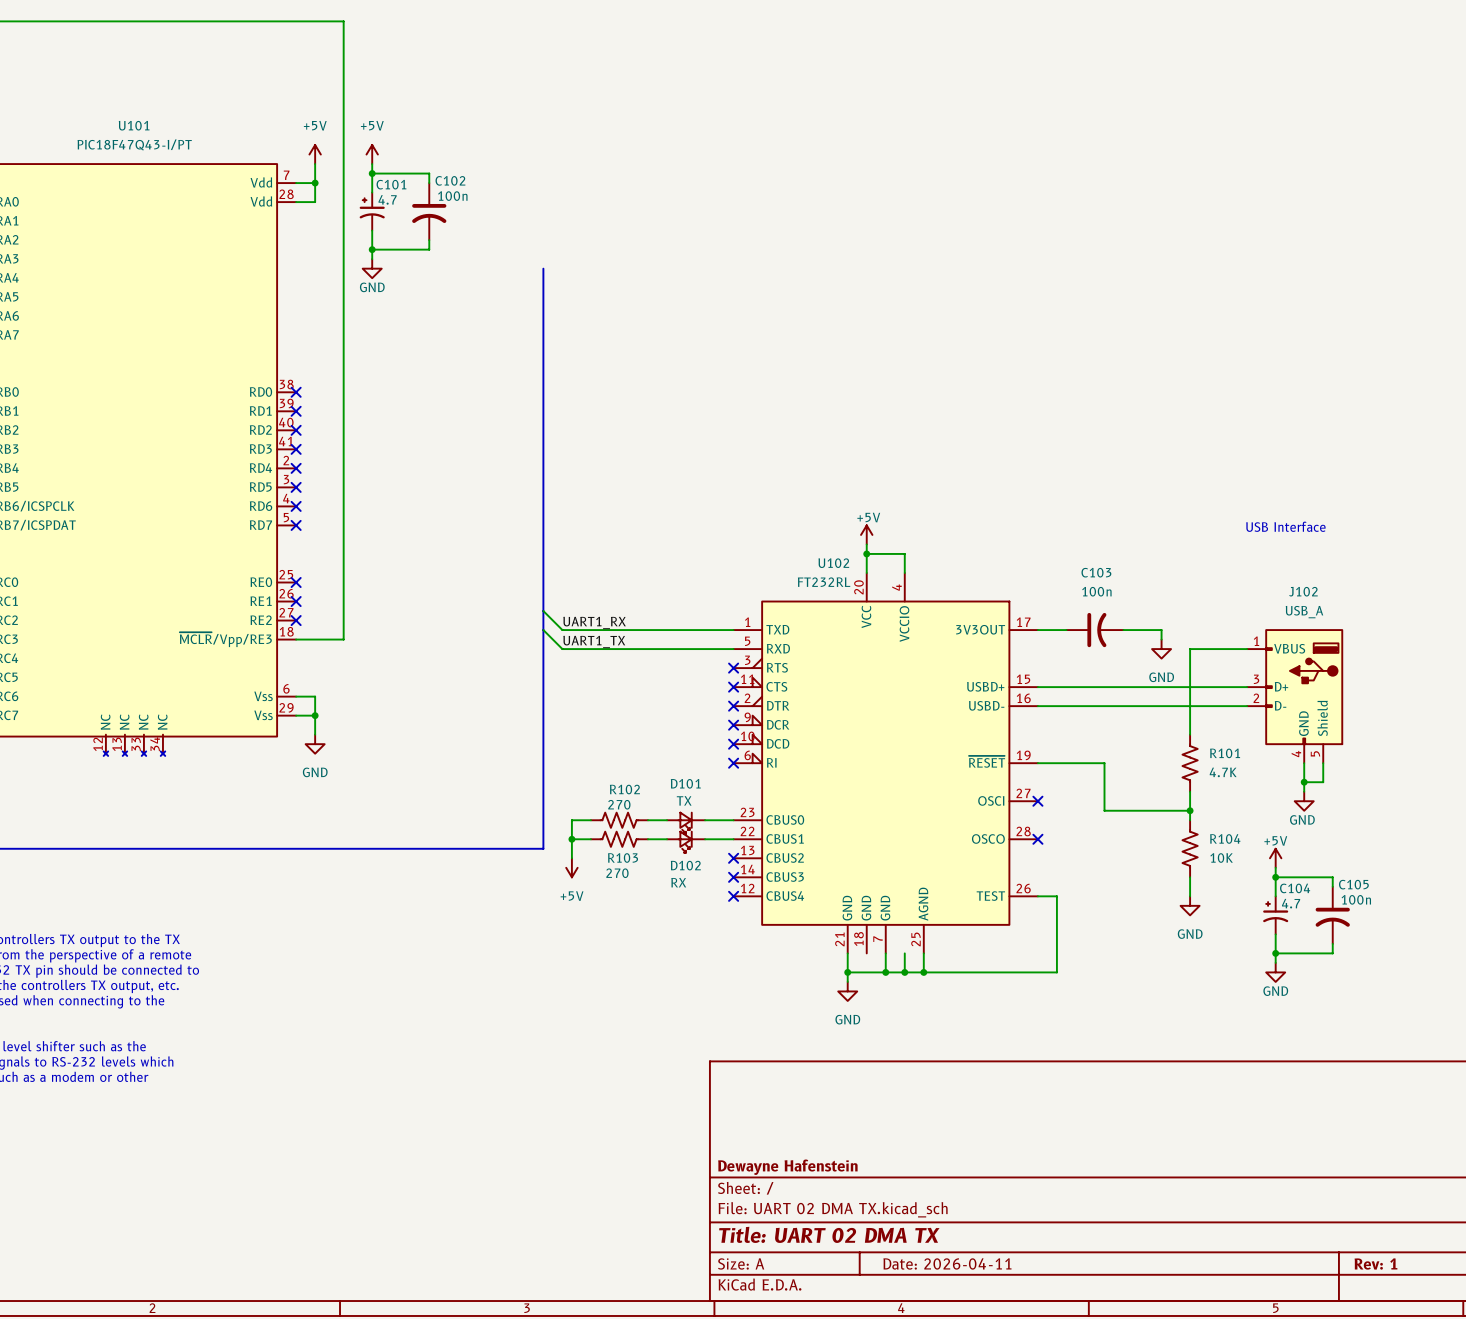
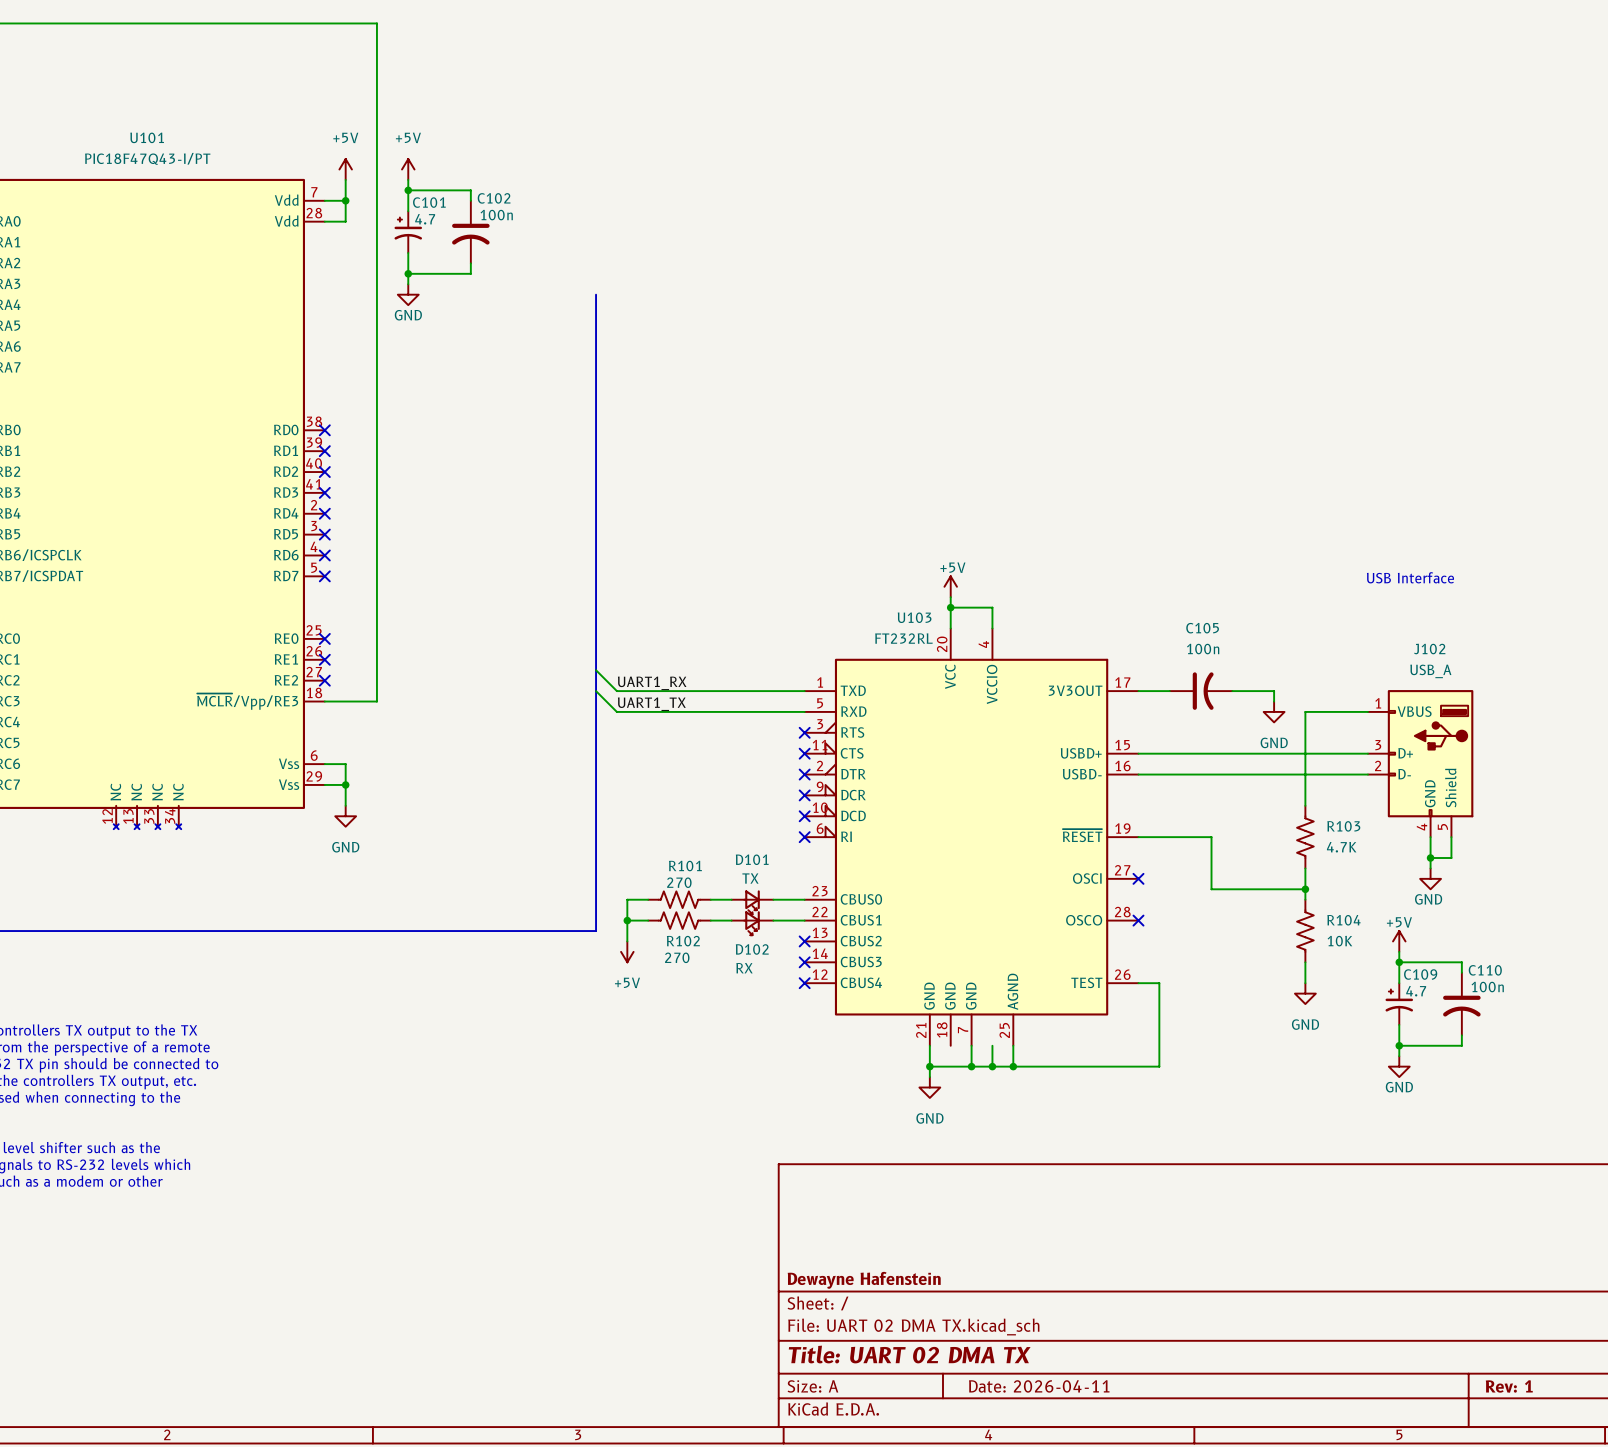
U102 name: U102 (833, 563) -> U103 (914, 617)
C103 name: C103 (1096, 572) -> C105 (1202, 628)
R101 name: R101 (1225, 753) -> R103 (1343, 826)
R102 name: R102 (624, 789) -> R101 (685, 866)
R103 name: R103 (623, 857) -> R102 (683, 941)
C105 name: C105 (1353, 884) -> C110 (1485, 970)
C104 name: C104 (1295, 888) -> C109 (1420, 974)

